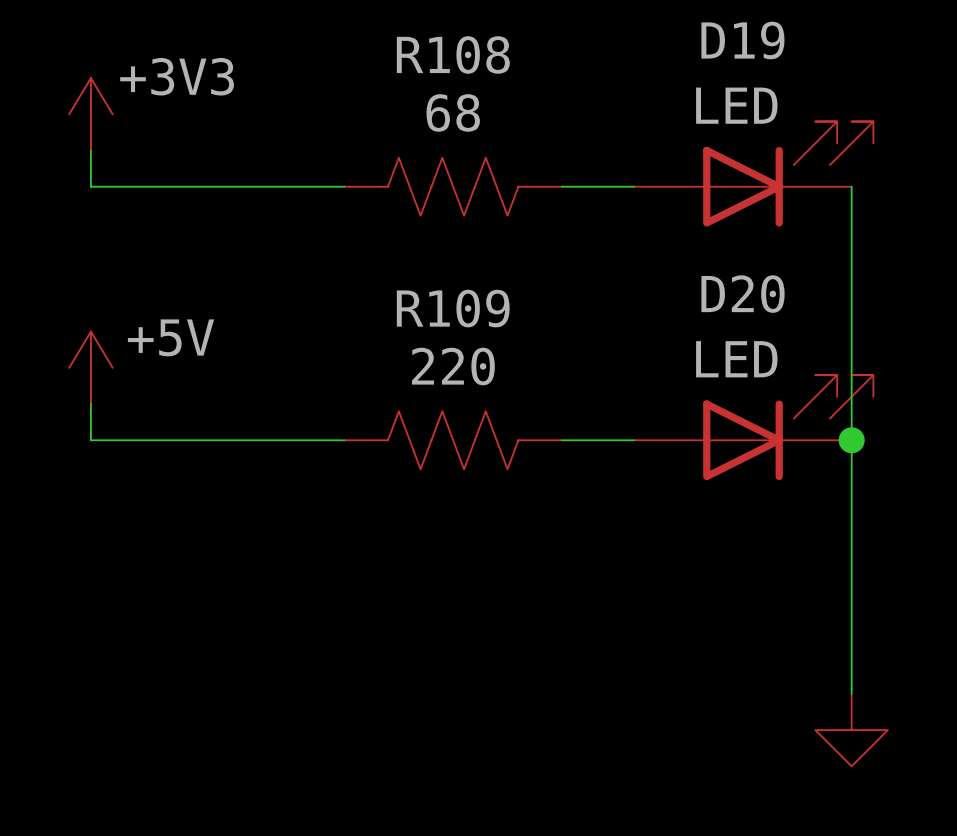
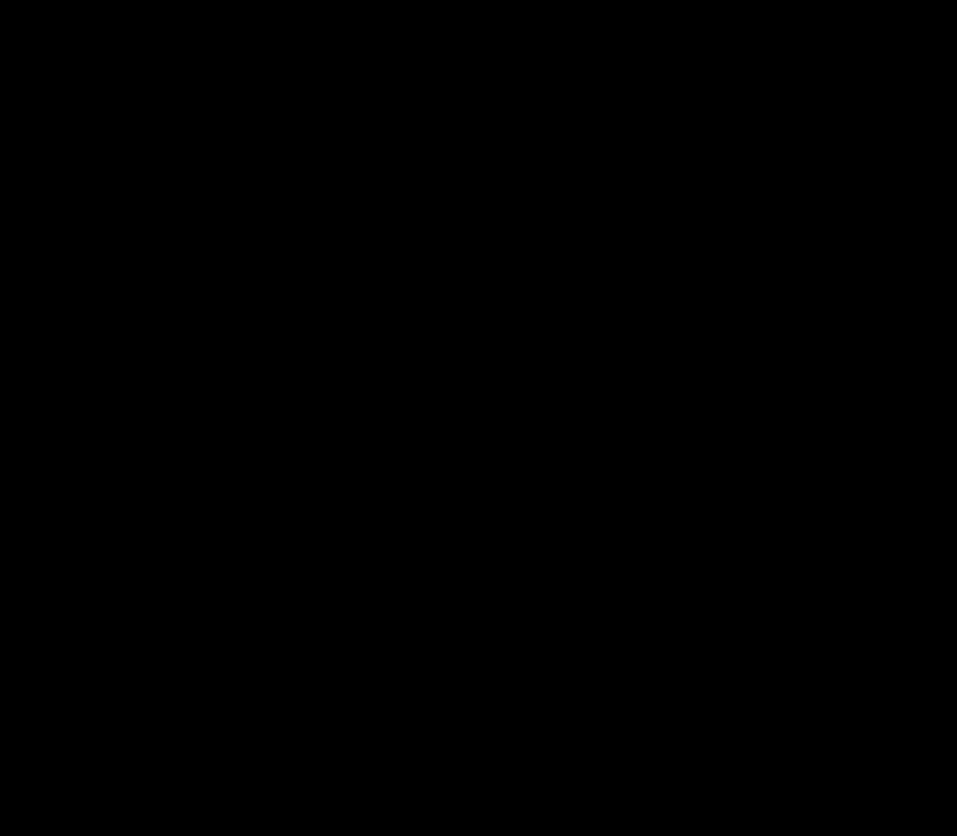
power symbol: +3V3 (90, 114) -> none
wire: (90, 150) (90, 186) (344, 186) -> none
D19: LED (753, 174) -> none
R108: 68 (453, 186) -> none
wire: (561, 186) (634, 186) -> none
wire: (851, 186) (851, 693) -> none
power symbol: +5V (90, 367) -> none
wire: (90, 404) (90, 440) (344, 440) -> none
D20: LED (753, 427) -> none
R109: 220 (453, 440) -> none
wire: (561, 440) (634, 440) -> none
junction: (851, 440) -> none
power symbol: (851, 730) -> none

